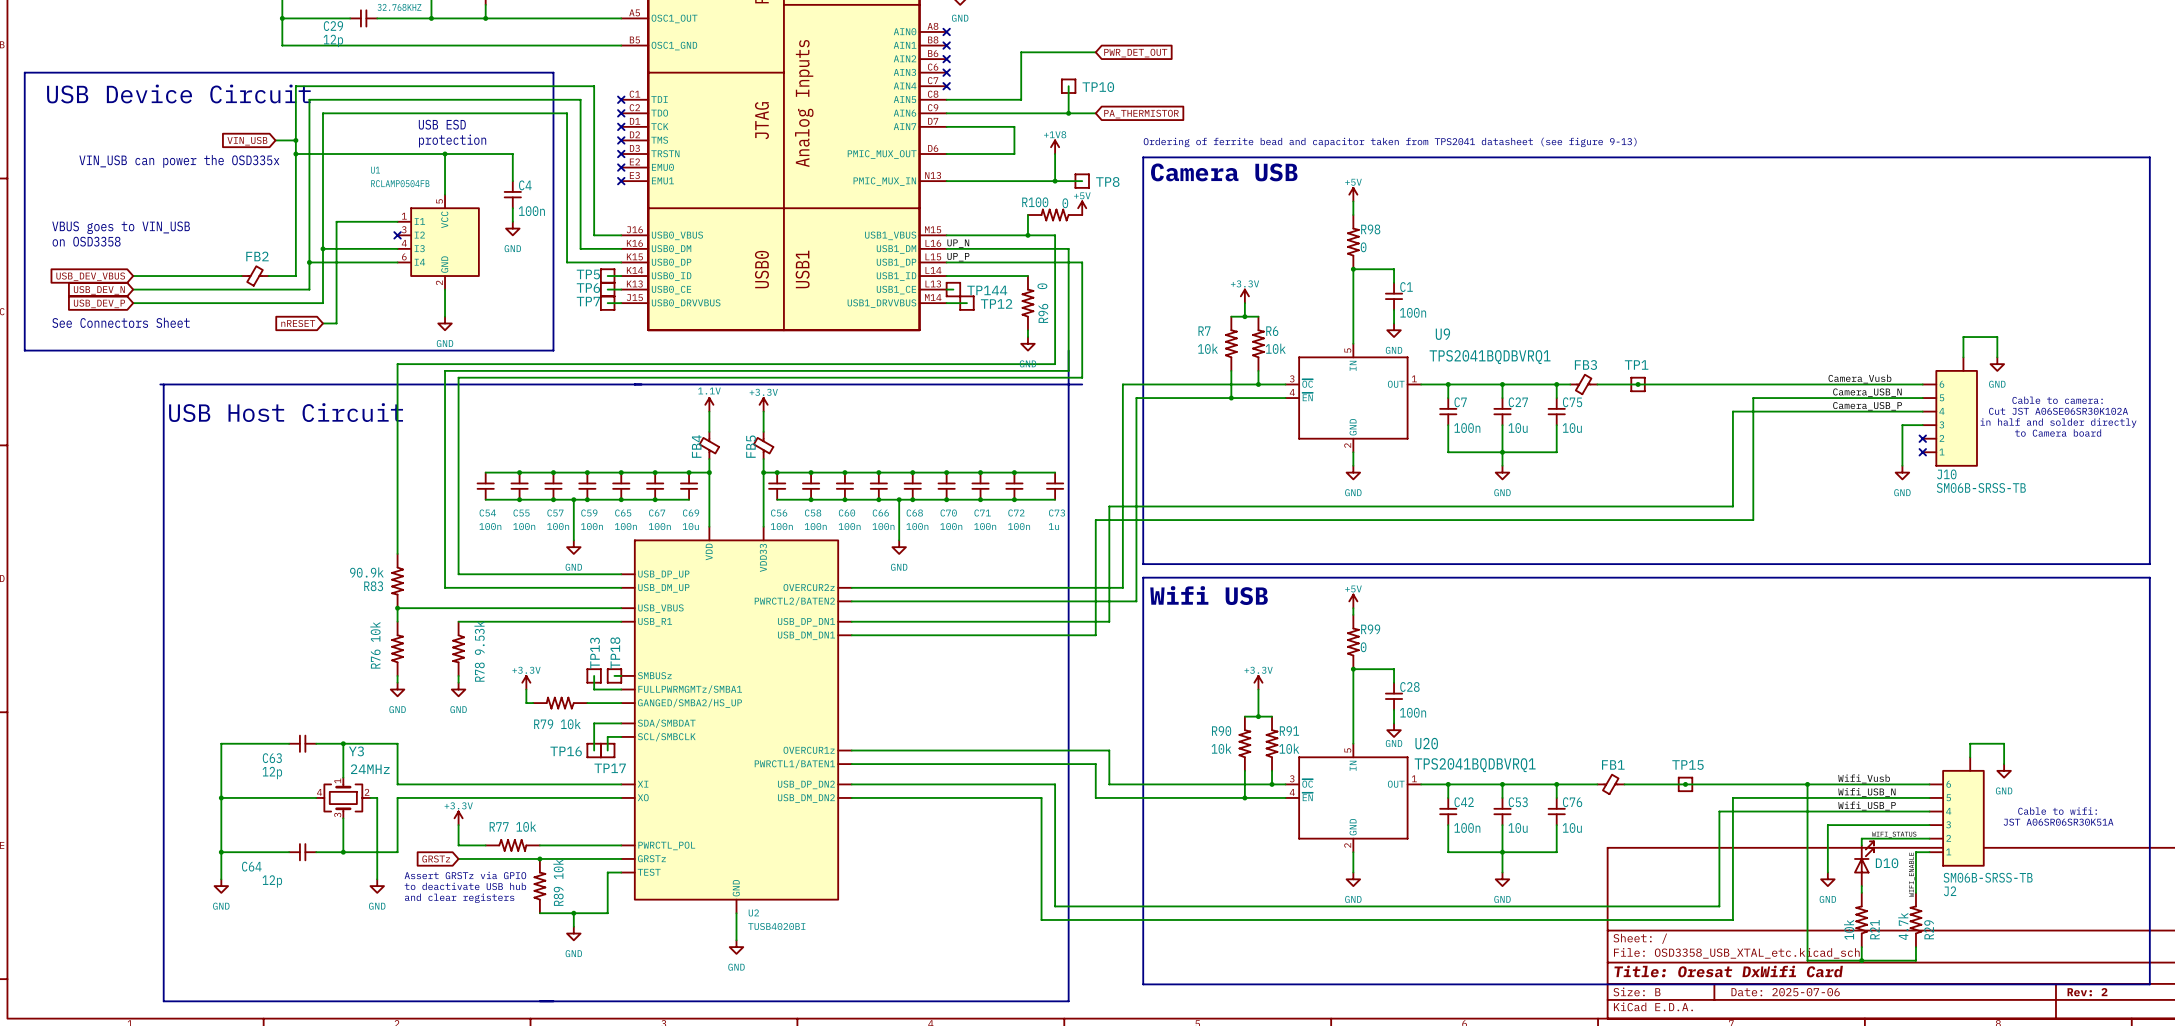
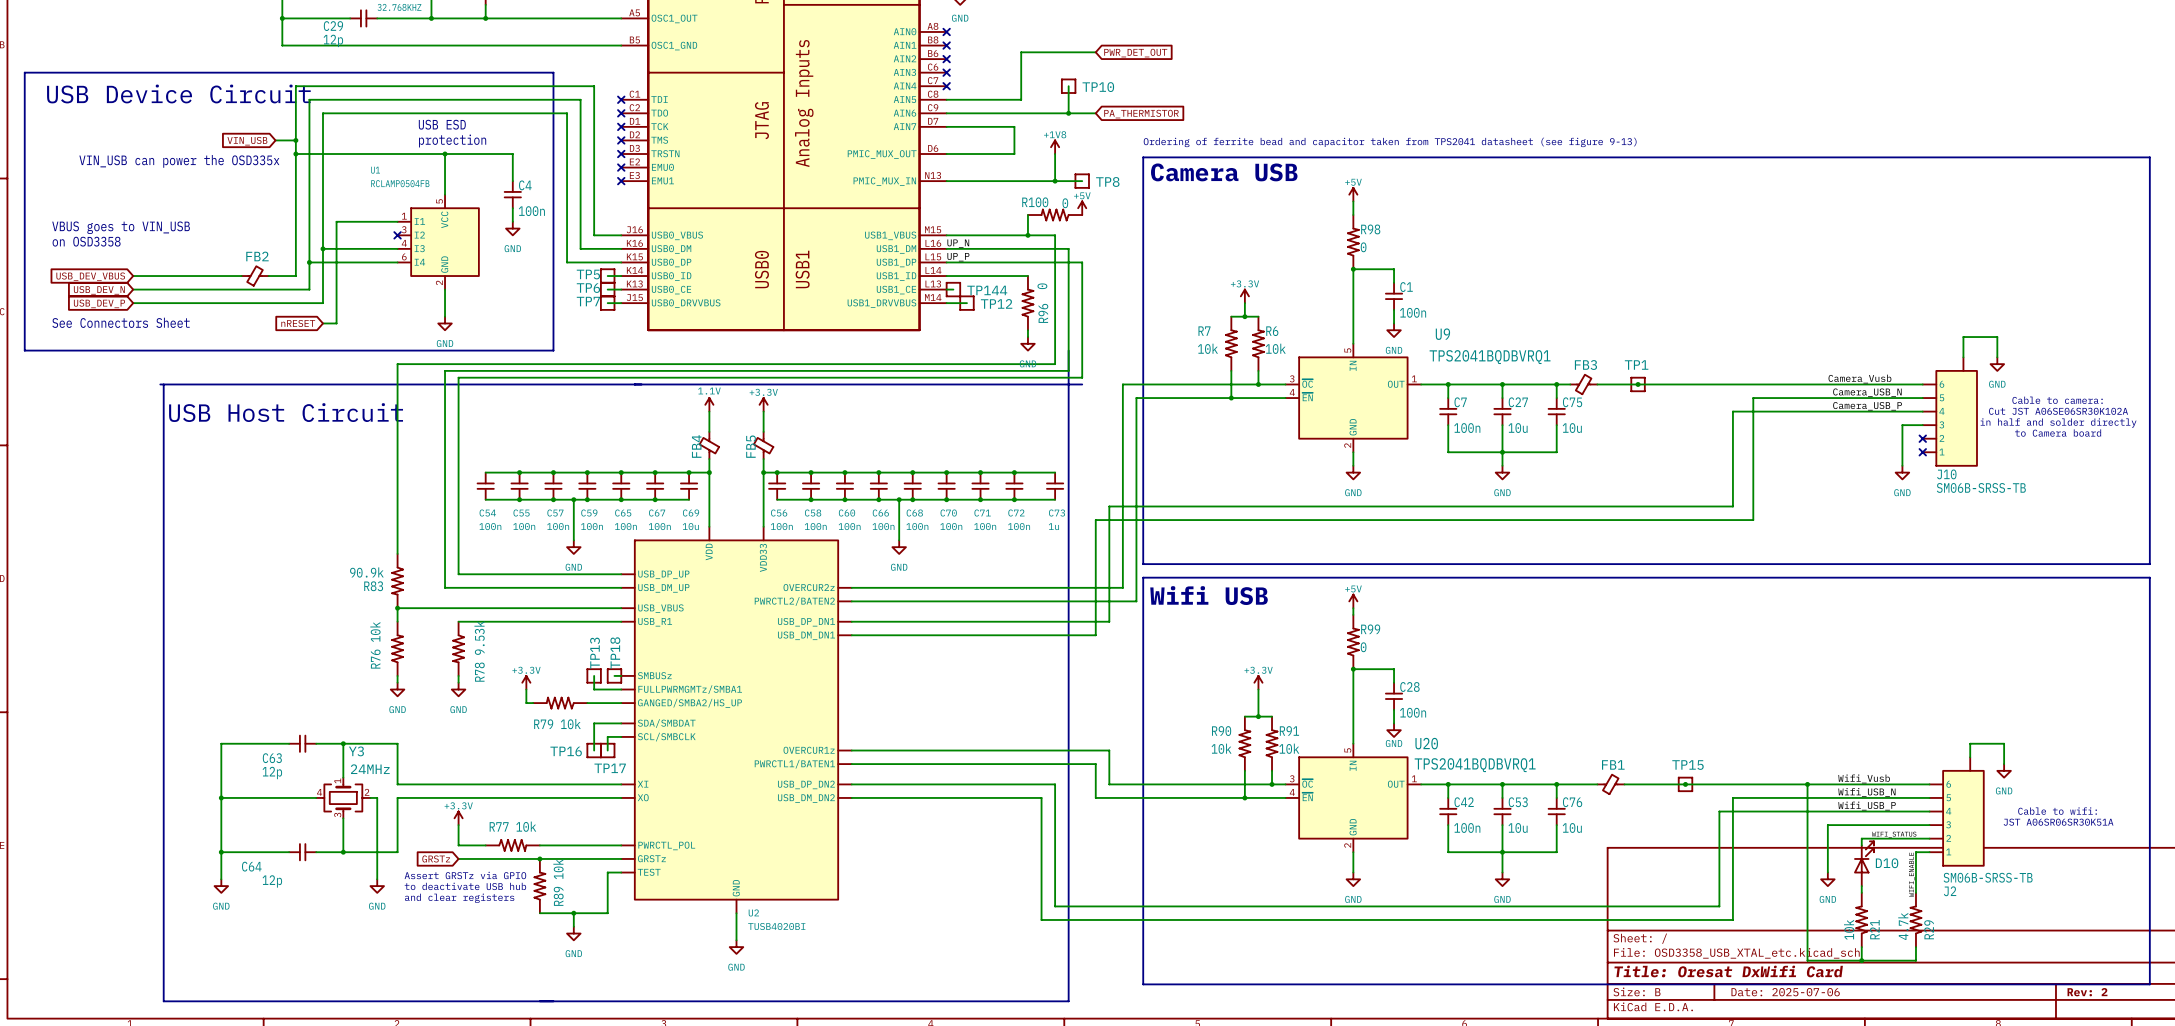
U9 symbol: [1285, 343, 1422, 453] -> [1285, 343, 1422, 453]
U20 symbol: [1285, 743, 1422, 853] -> [1285, 743, 1422, 853]

